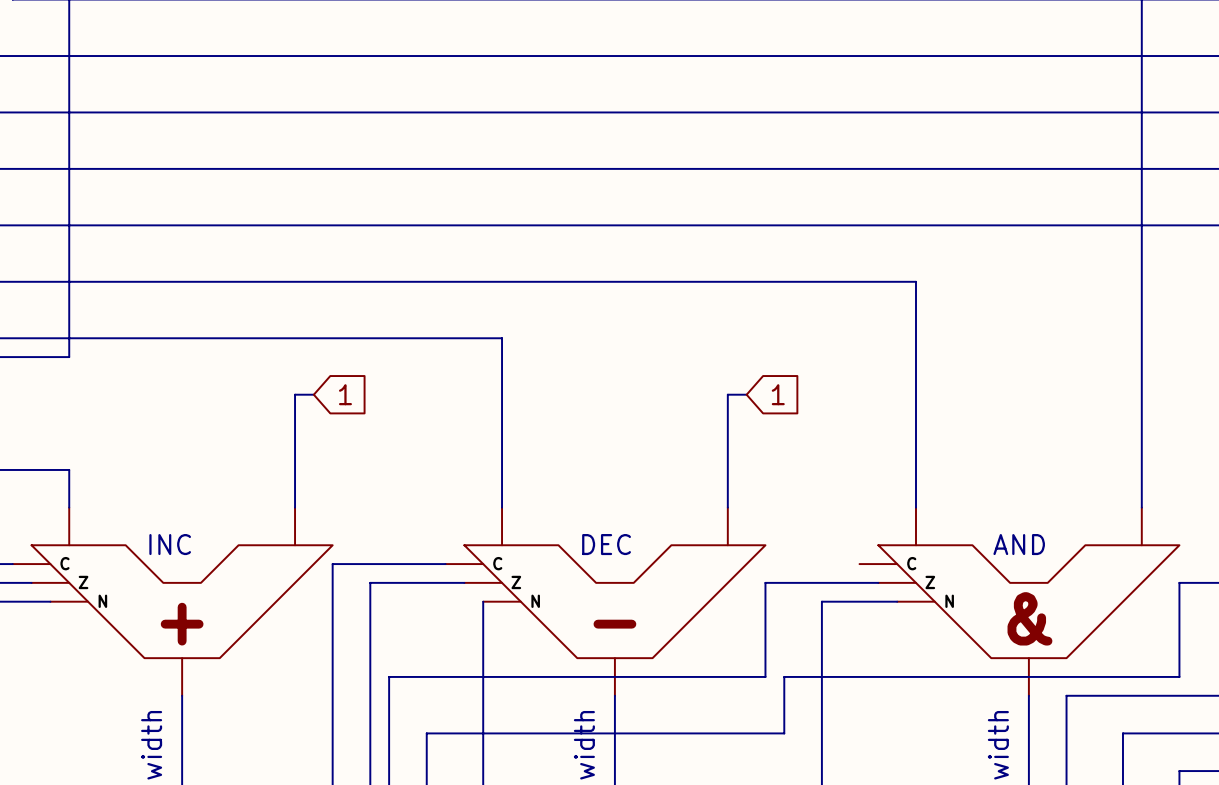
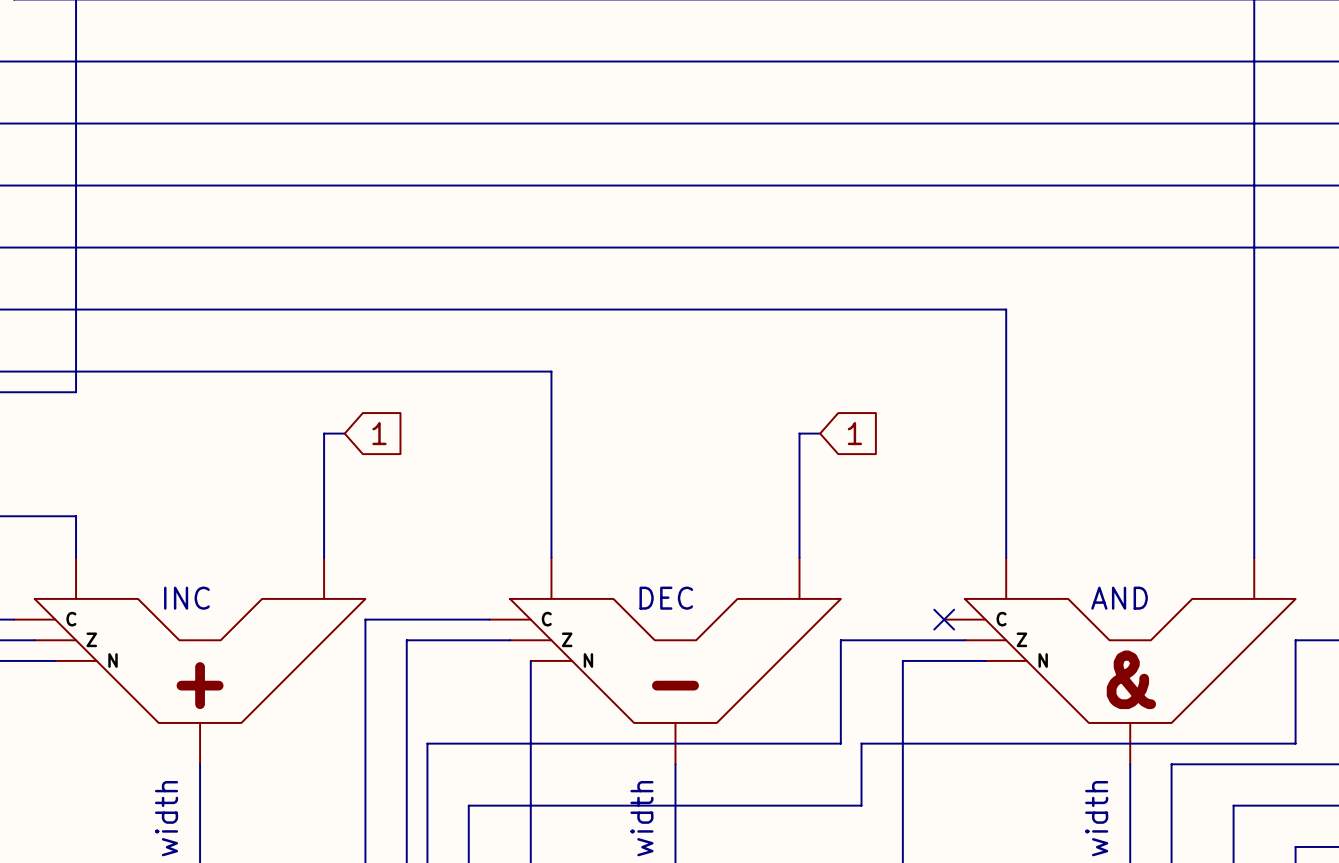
no-connect mark: none -> (944, 619)

